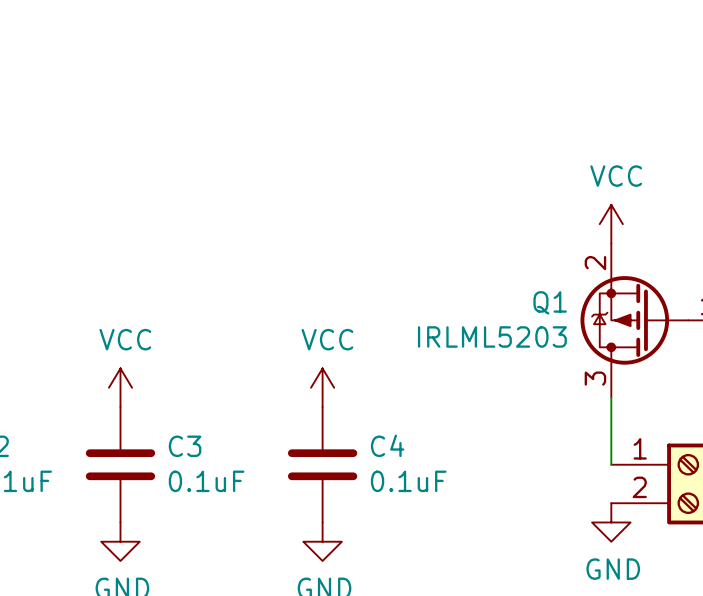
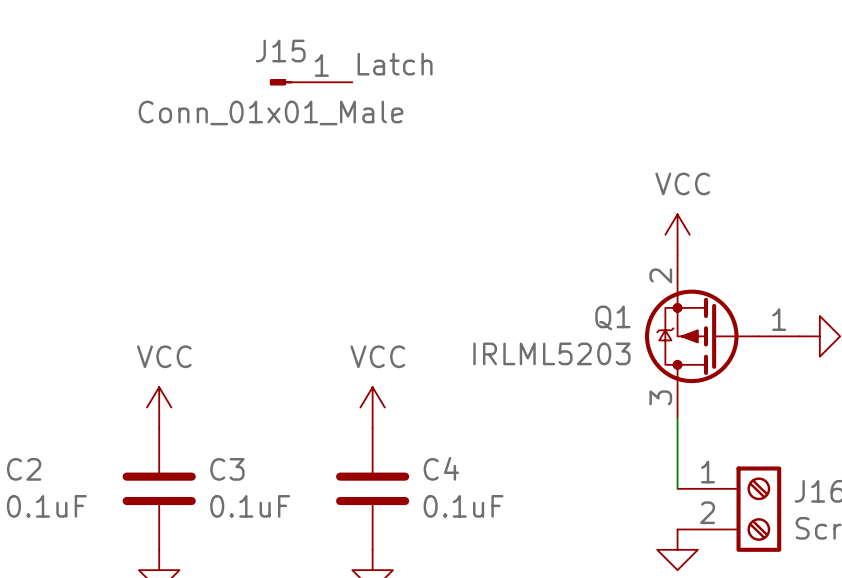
label: none -> Latch (395, 64)
J15: none -> Conn_01x01_Male (311, 82)

